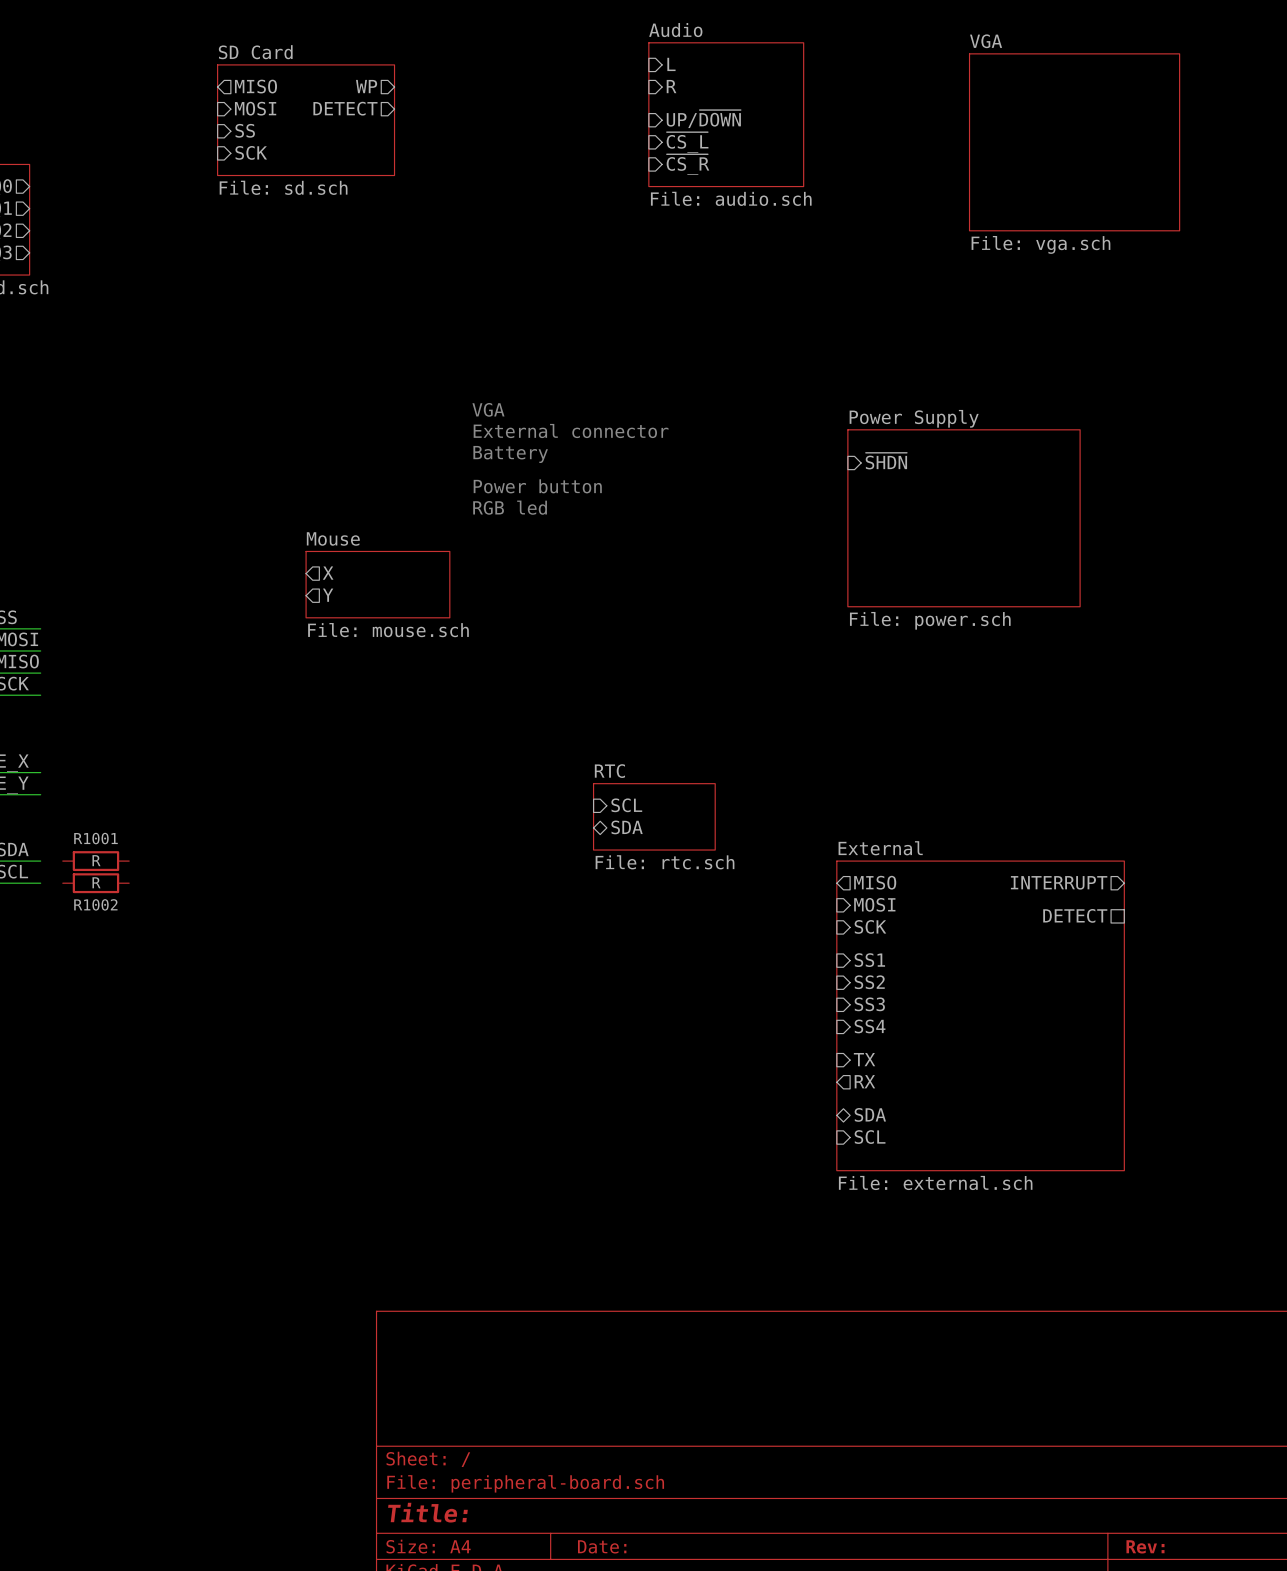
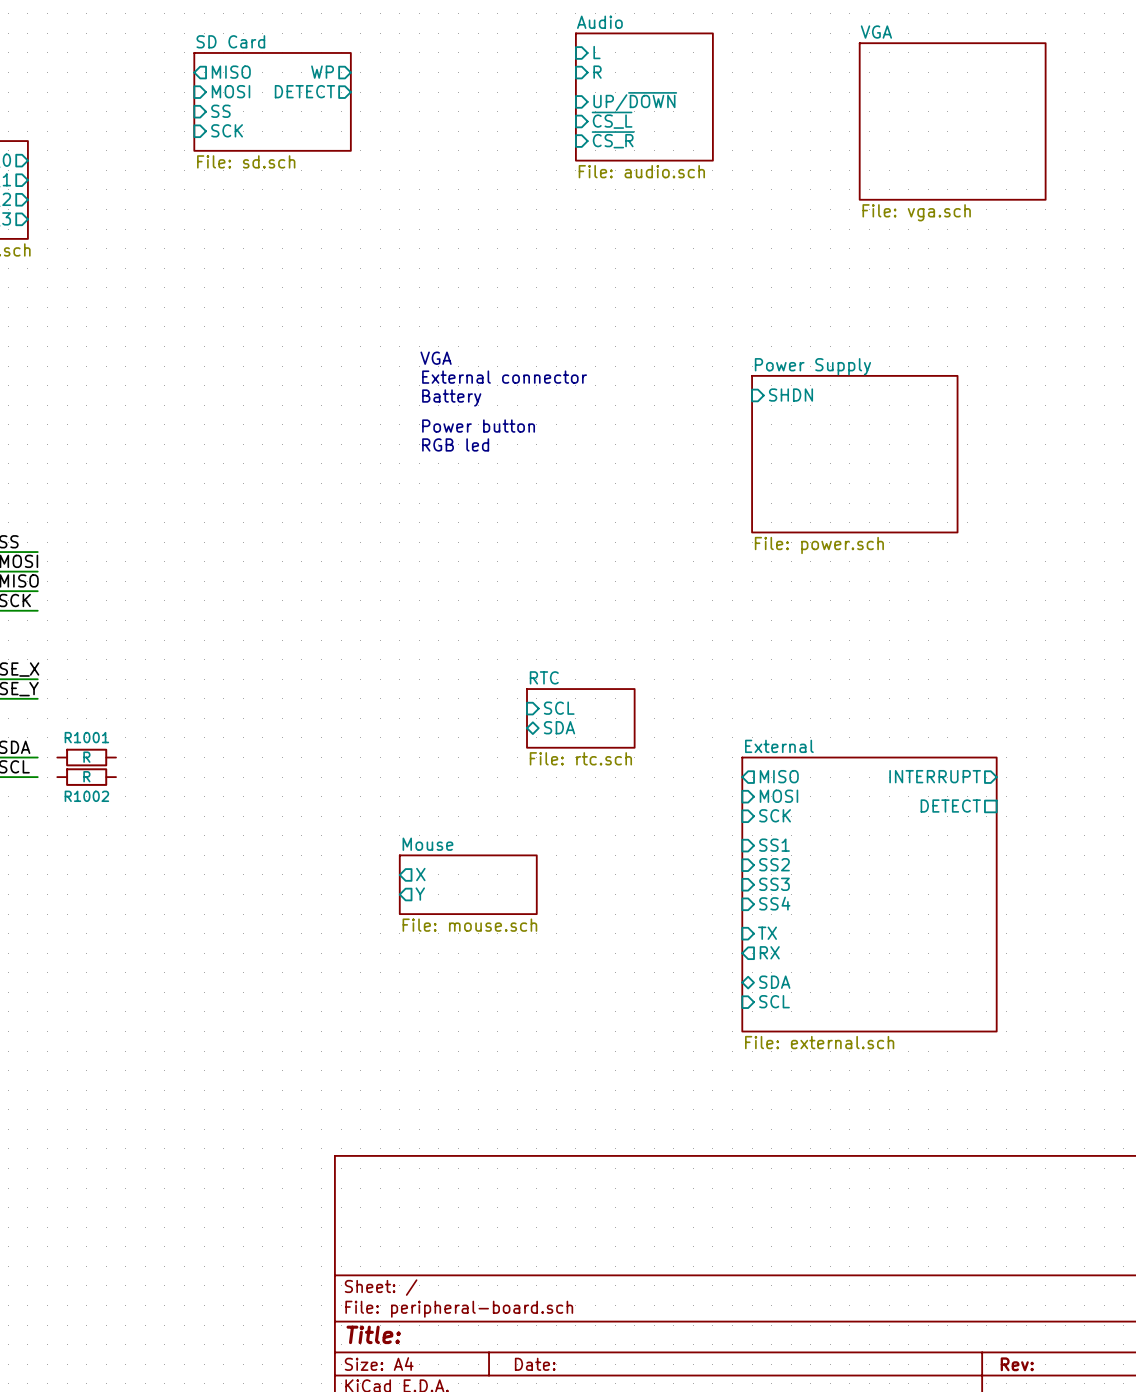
sheet pin: ~{SHDN} (886, 461) -> SHDN (790, 395)
sheet pin: X (328, 573) -> none
sheet Mouse: File: mouse.sch (377, 584) -> none
sheet pin: Y (328, 595) -> none
sheet pin: none -> X (420, 874)
sheet Mouse: none -> File: mouse.sch (468, 884)
sheet pin: none -> Y (420, 894)

